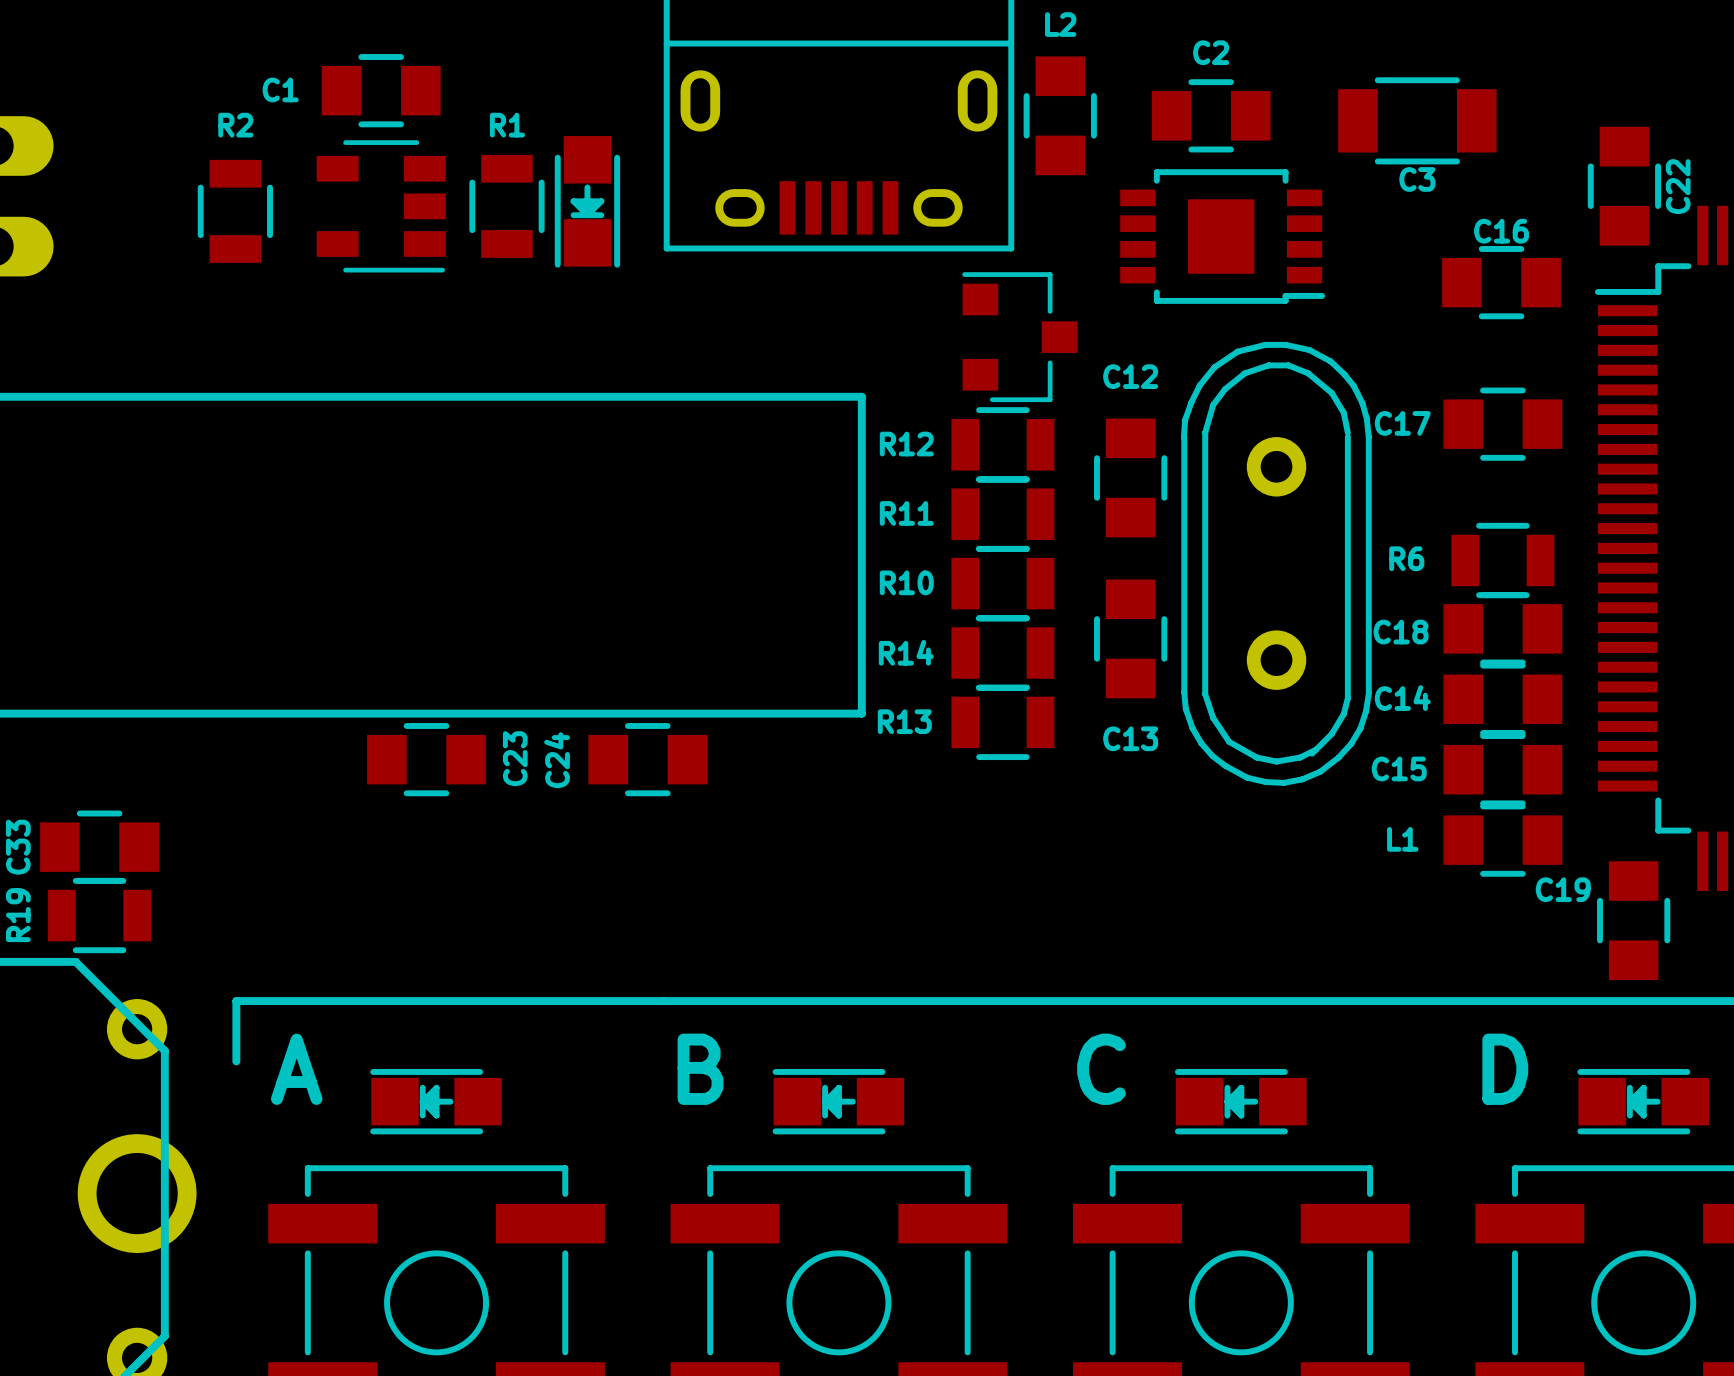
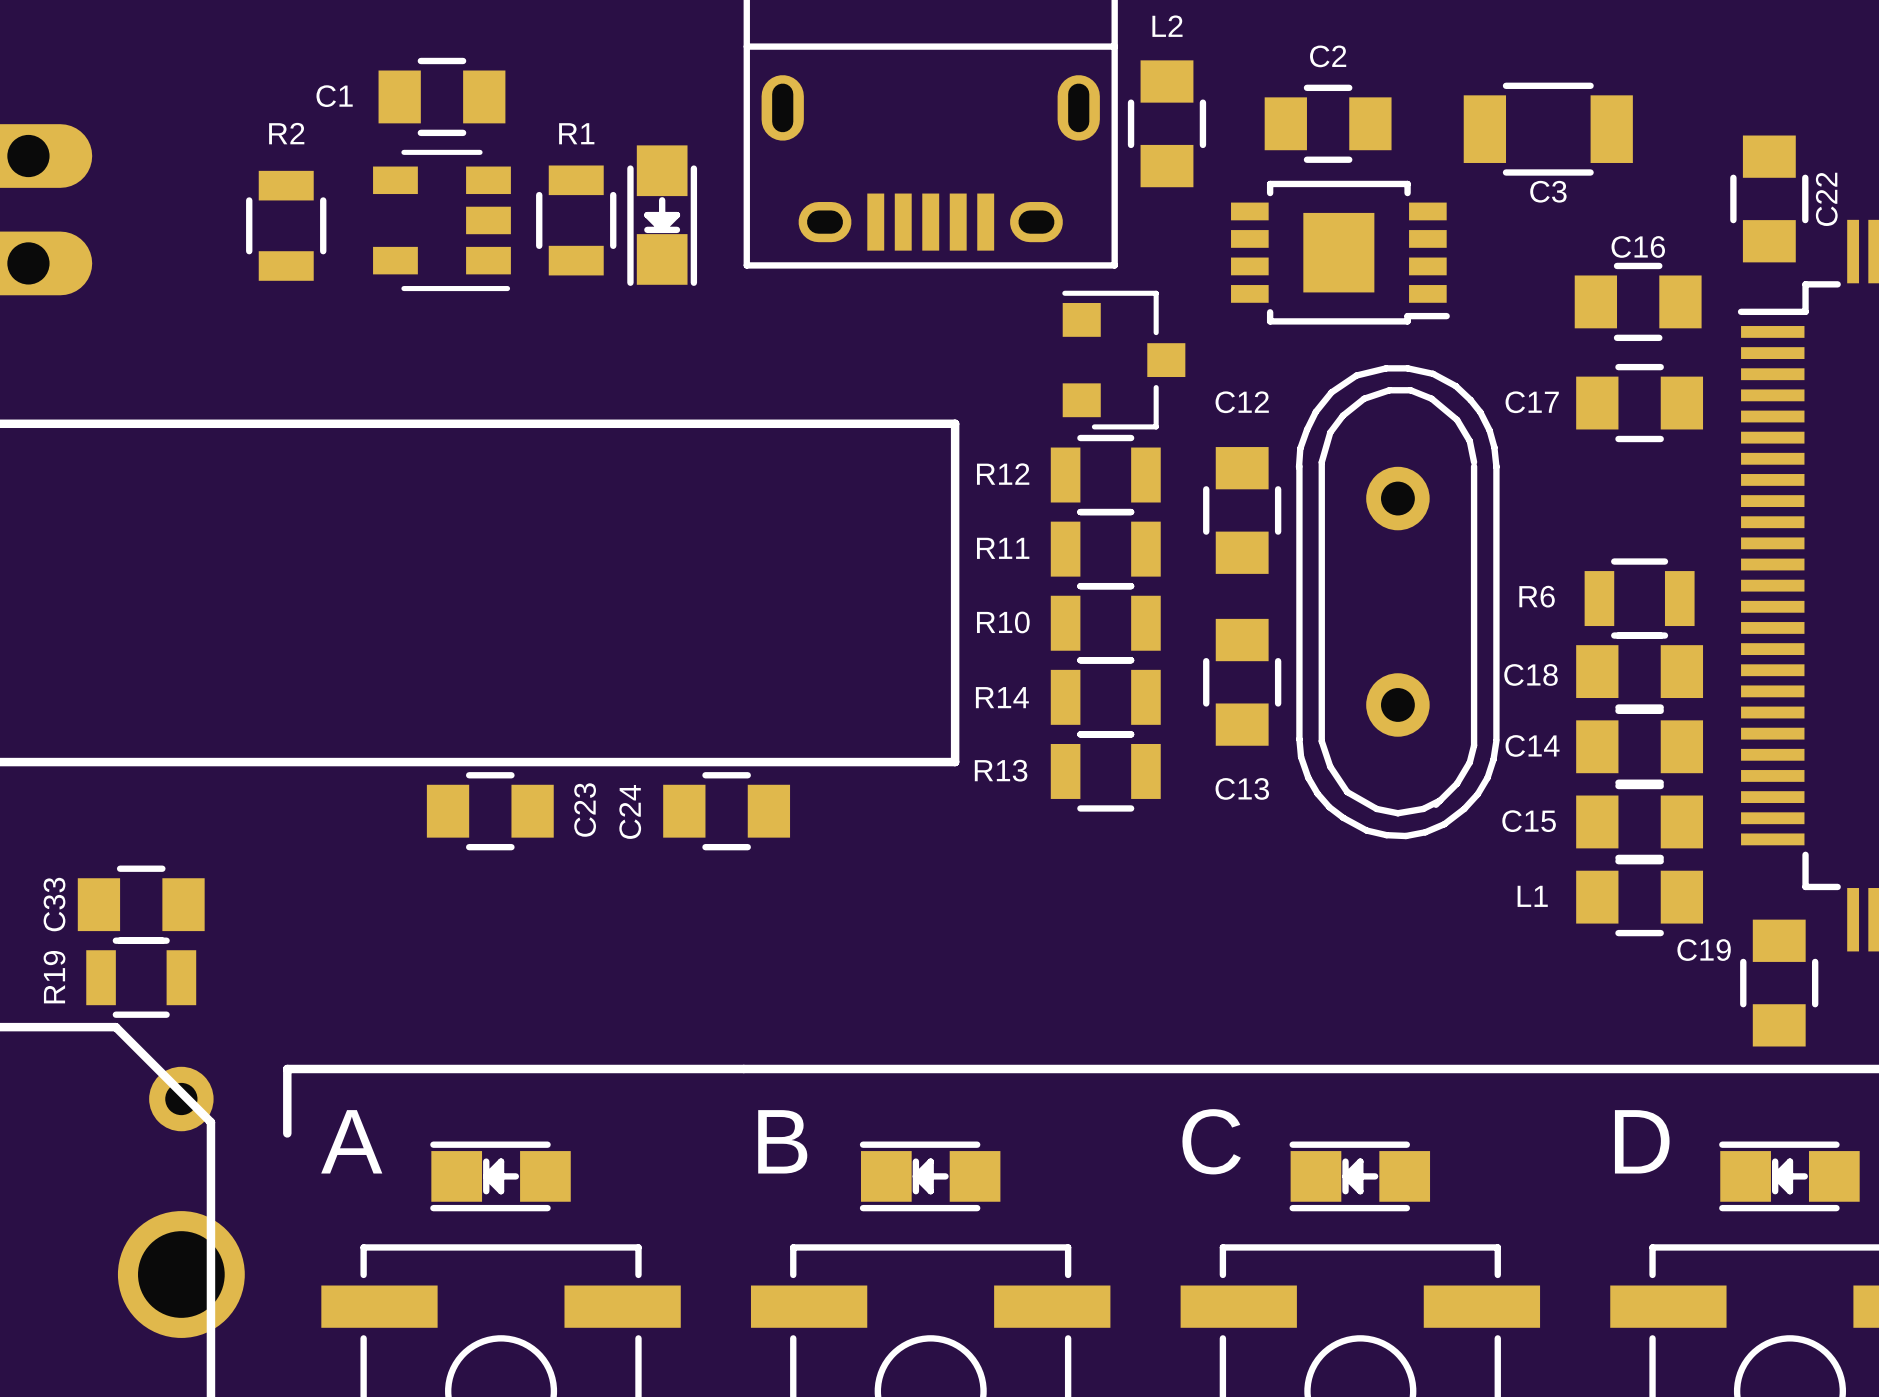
C17 position: (1502, 424) -> (1639, 403)

